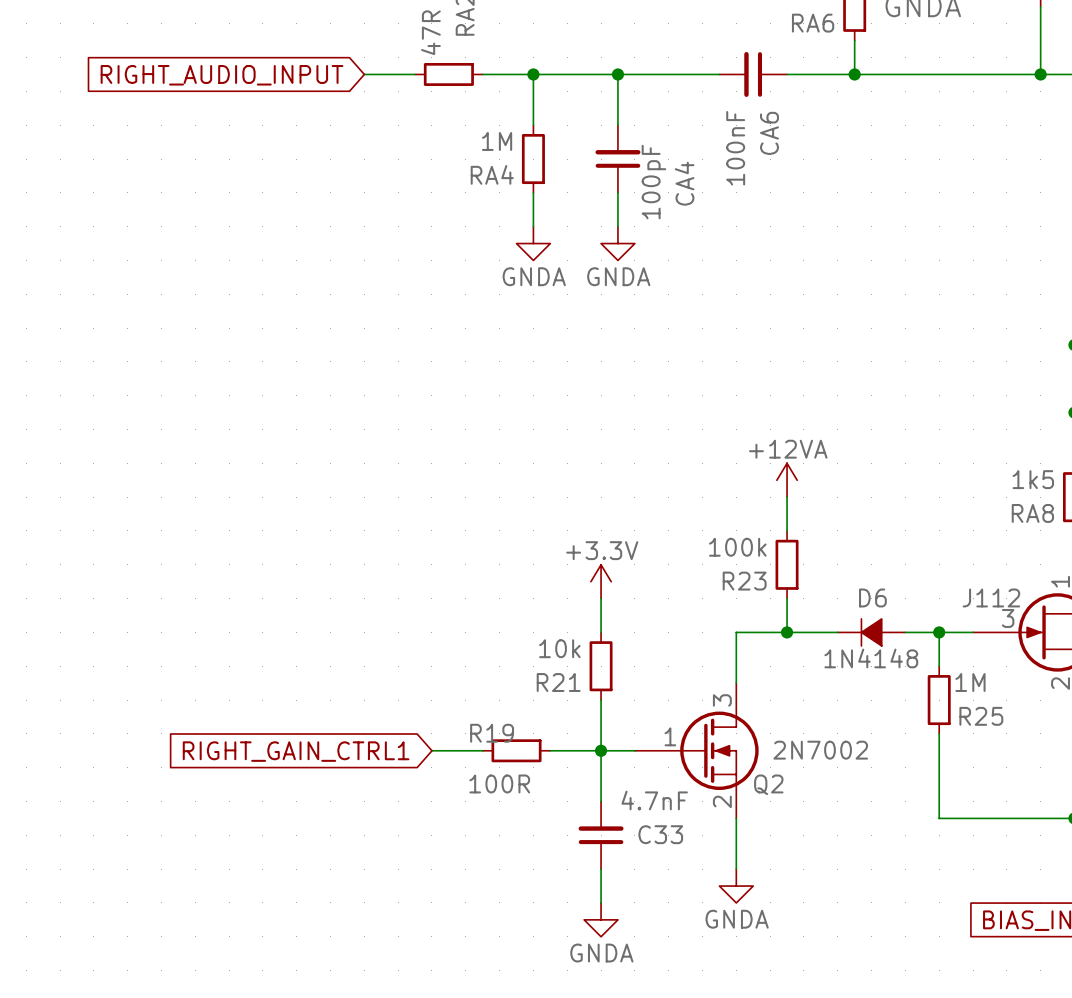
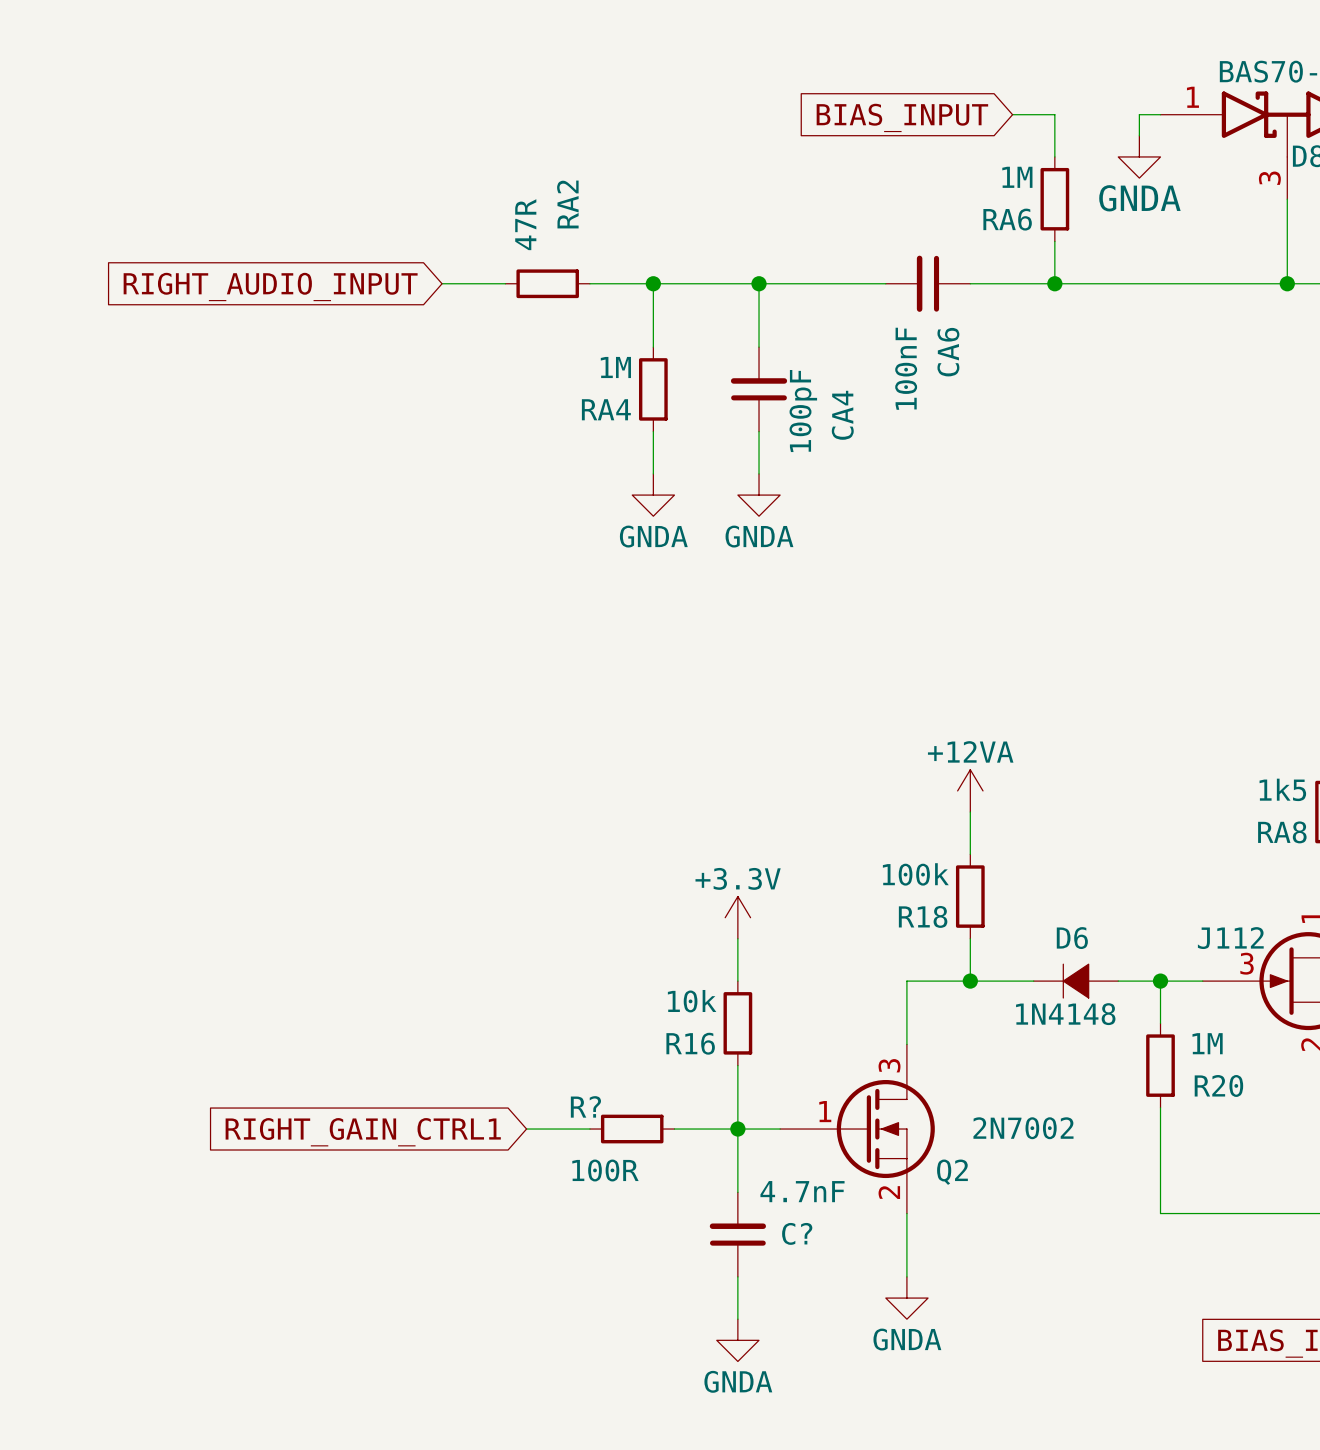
R23 name: R23 (744, 581) -> R18 (923, 916)
R21 name: R21 (558, 682) -> R16 (690, 1043)
R25 name: R25 (981, 716) -> R20 (1218, 1085)
R19 name: R19 (492, 733) -> R? (585, 1106)
C33 name: C33 (660, 834) -> C? (797, 1233)

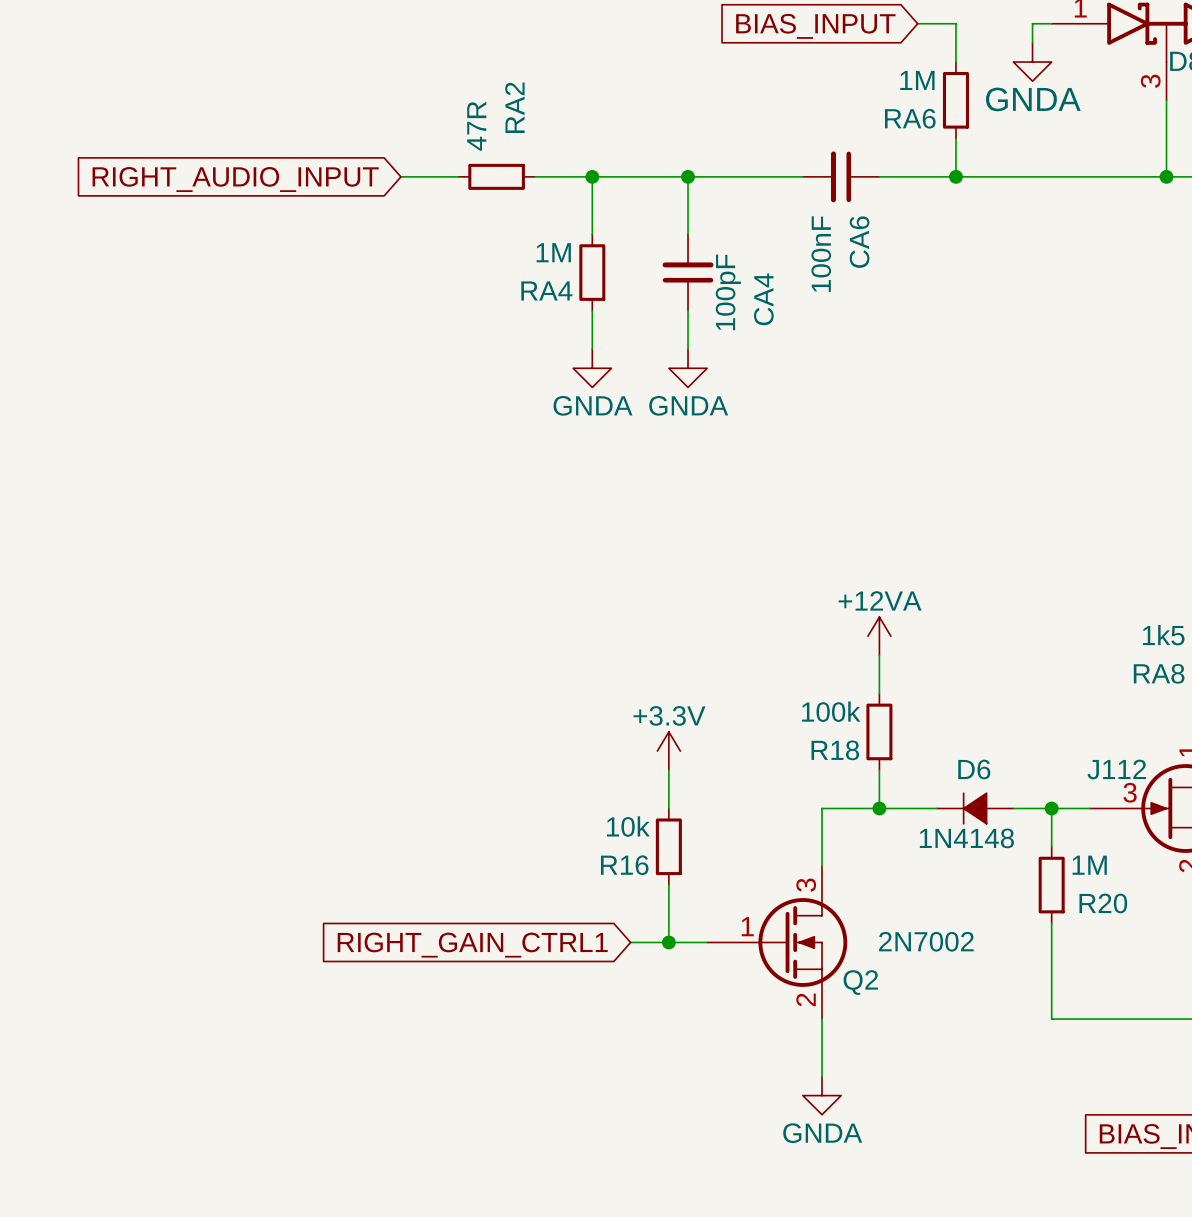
wire: (526, 1129) (589, 1129) -> none
R?: 100R (632, 1129) -> none
wire: (674, 1129) (695, 1129) -> none
wire: (737, 1129) (737, 1192) -> none
global label position: RIGHT_GAIN_CTRL1 (363, 1132) -> RIGHT_GAIN_CTRL1 (472, 945)
C?: 4.7nF (737, 1234) -> none
wire: (737, 1276) (737, 1319) -> none
power symbol: GNDA (737, 1340) -> none

